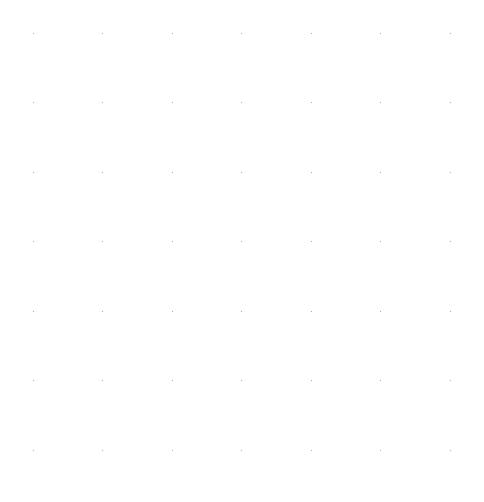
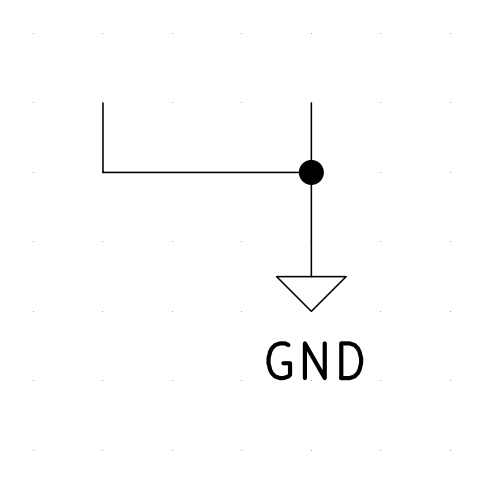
wire: none -> (102, 102) (102, 172) (311, 172)
wire: none -> (311, 102) (311, 241)
junction: none -> (311, 172)
power symbol: none -> GND (311, 276)

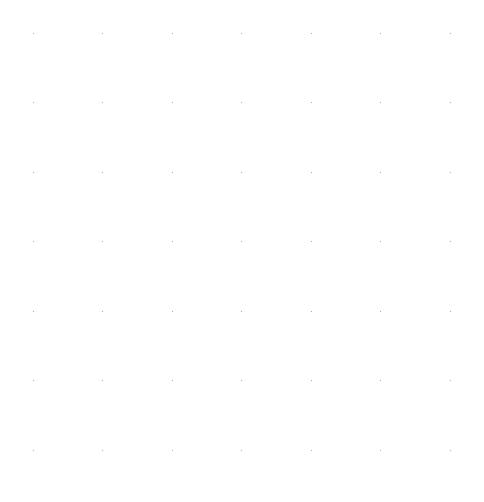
wire: (102, 102) (102, 172) (311, 172) -> none
wire: (311, 102) (311, 241) -> none
junction: (311, 172) -> none
power symbol: GND (311, 276) -> none

